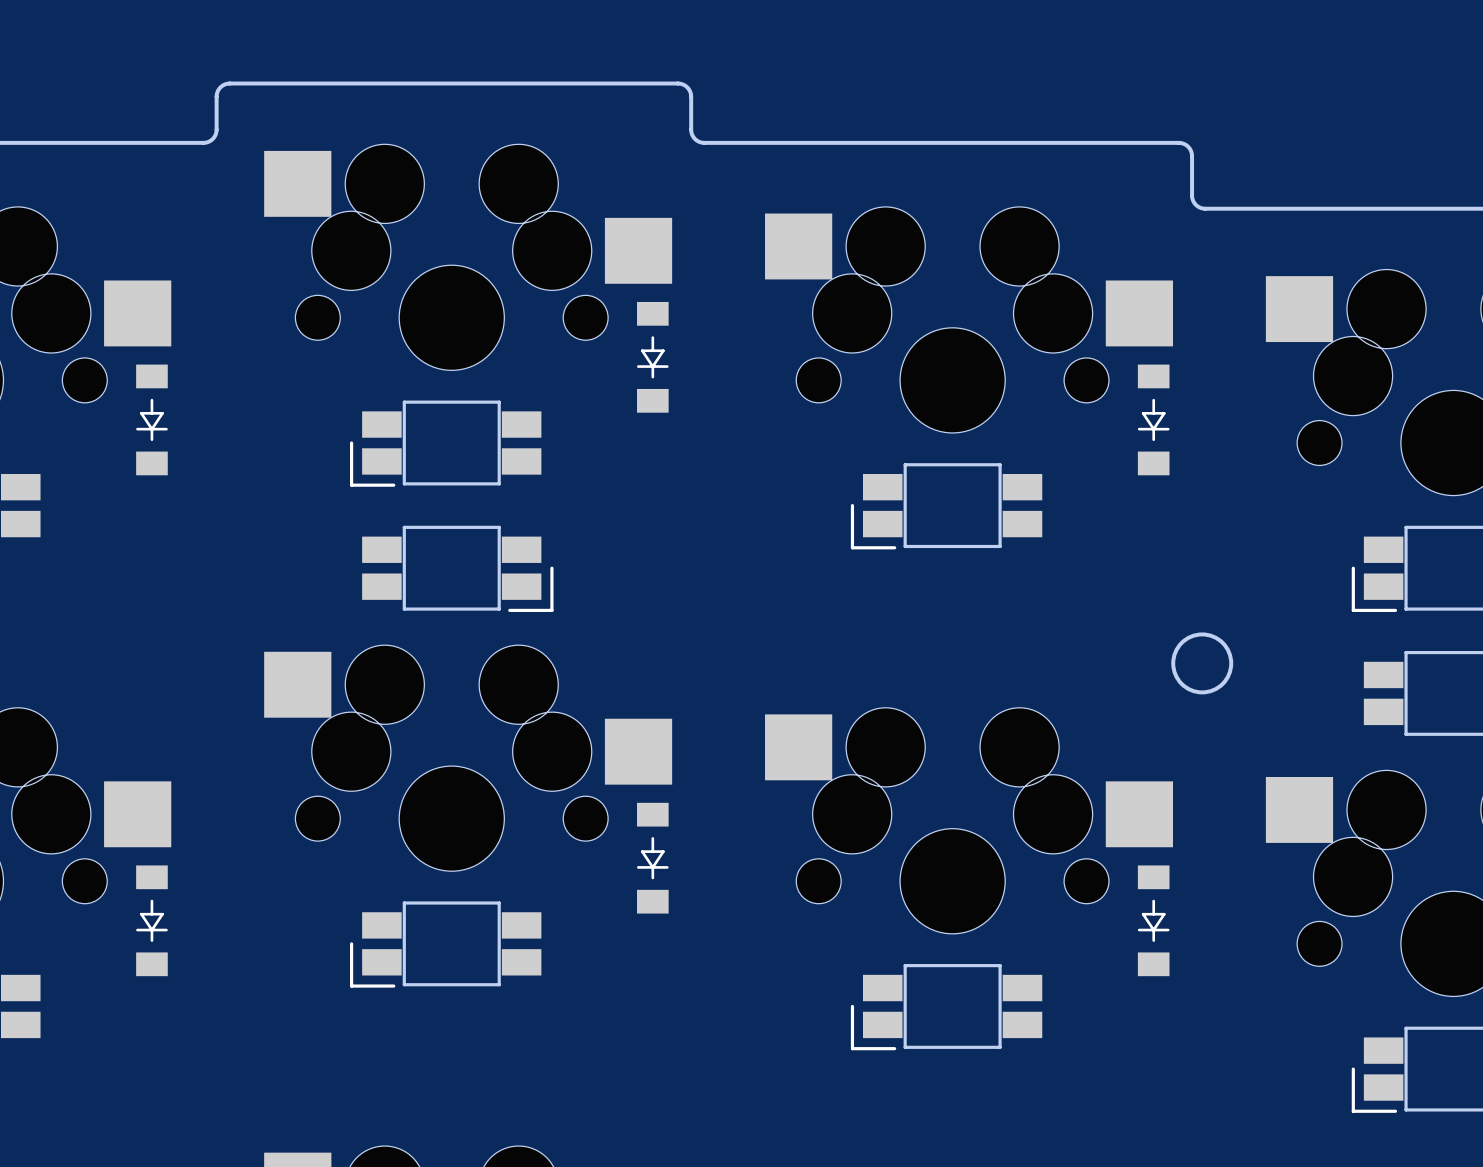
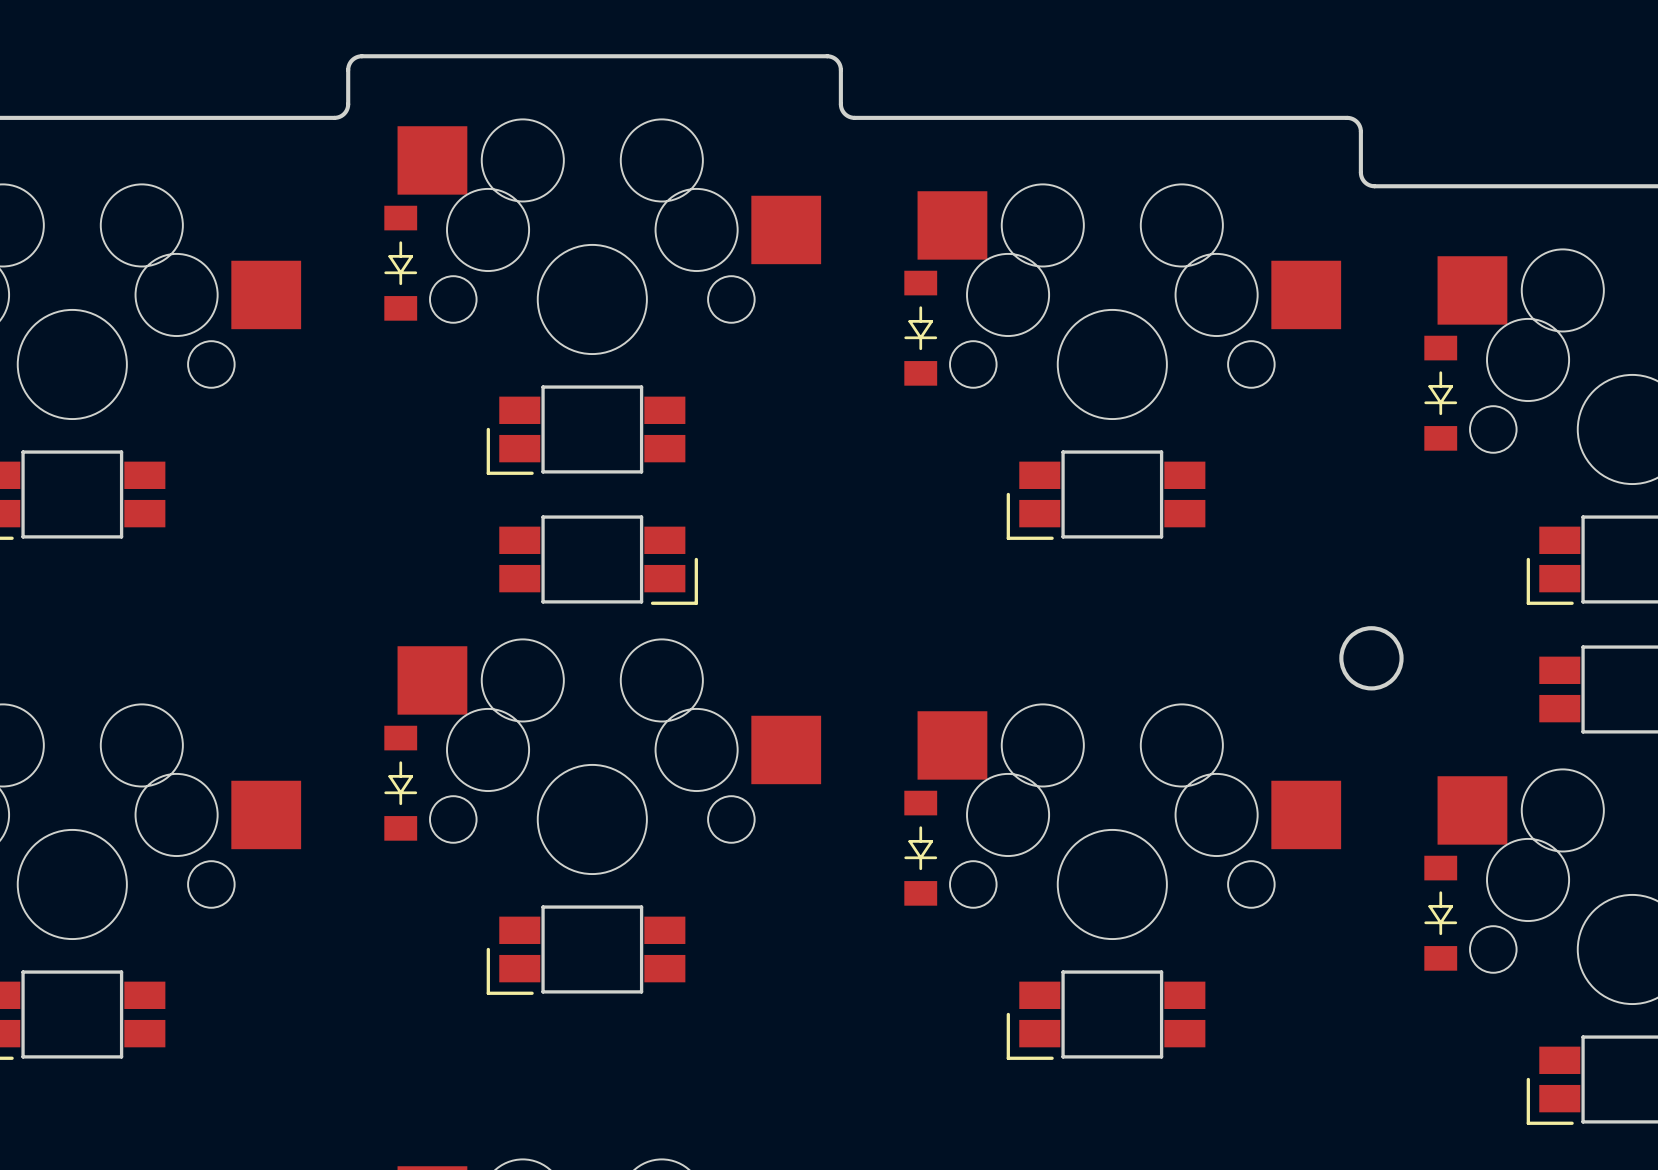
part position: (652, 357) -> (920, 328)
part position: (151, 419) -> (400, 263)
part position: (1153, 419) -> (1440, 393)
part position: (652, 858) -> (920, 848)
part position: (151, 920) -> (400, 783)
part position: (1153, 920) -> (1440, 913)

